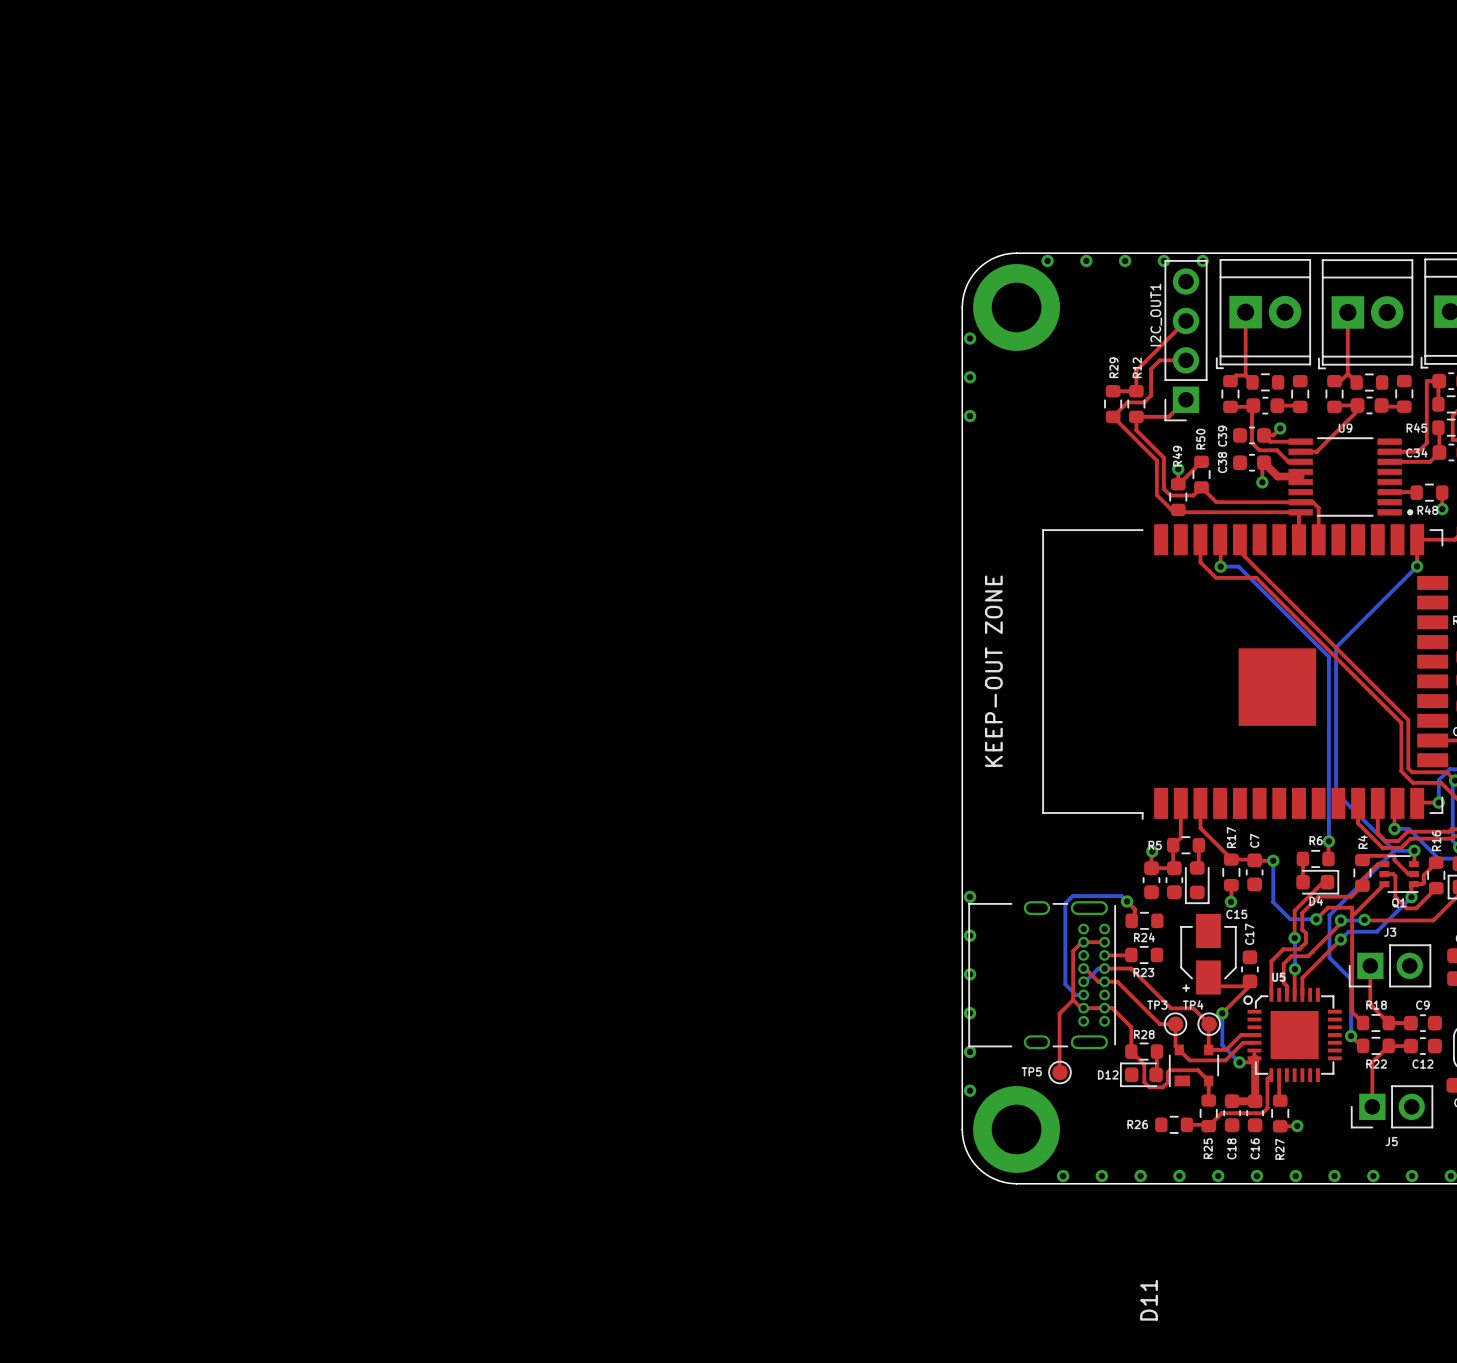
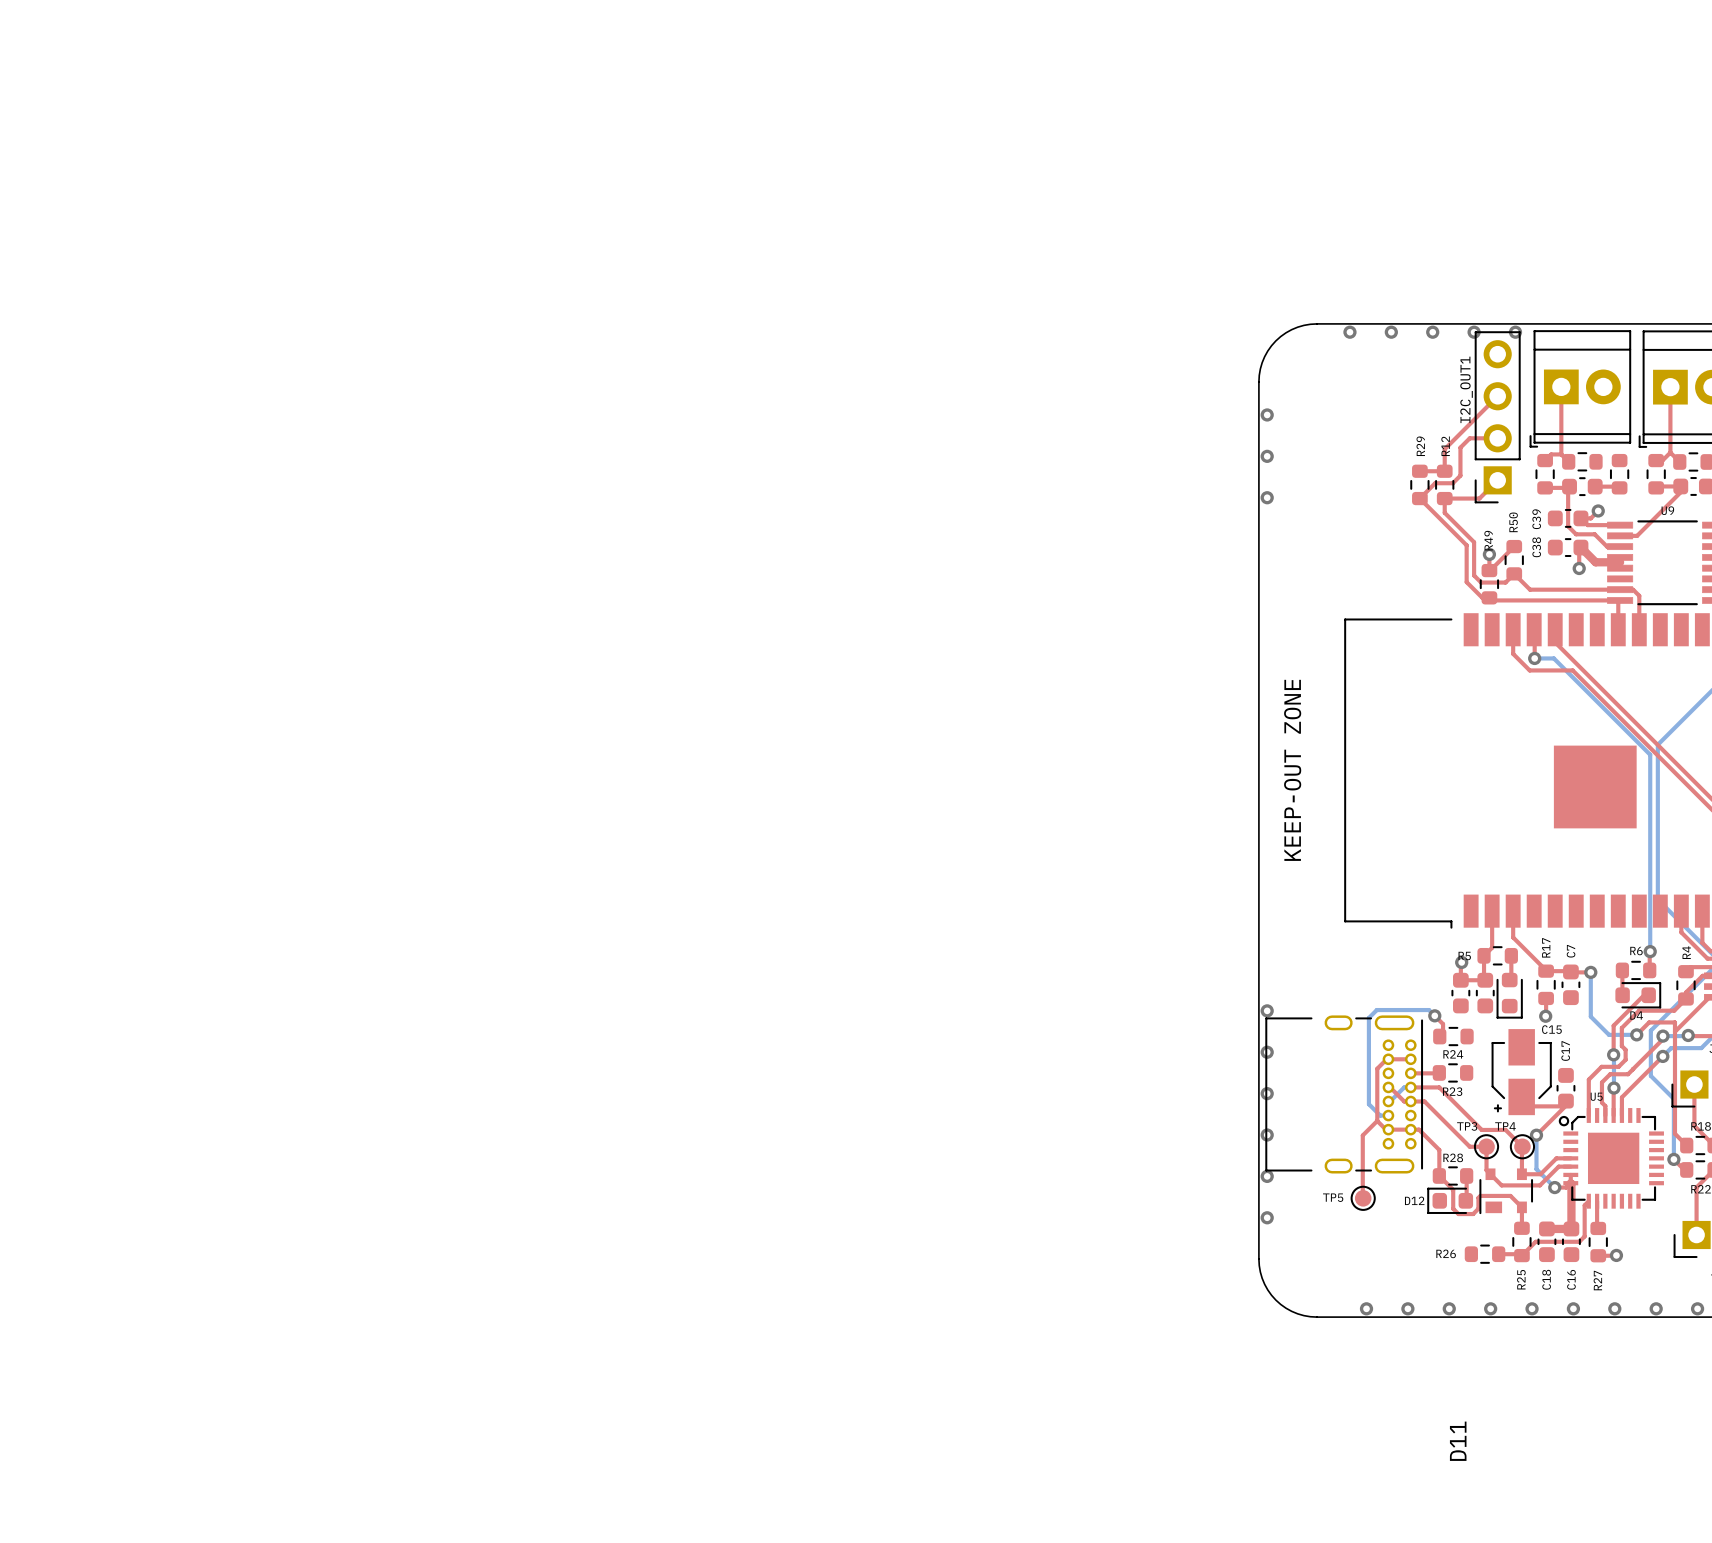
part: (1016, 307) -> none
part: (1016, 1129) -> none

